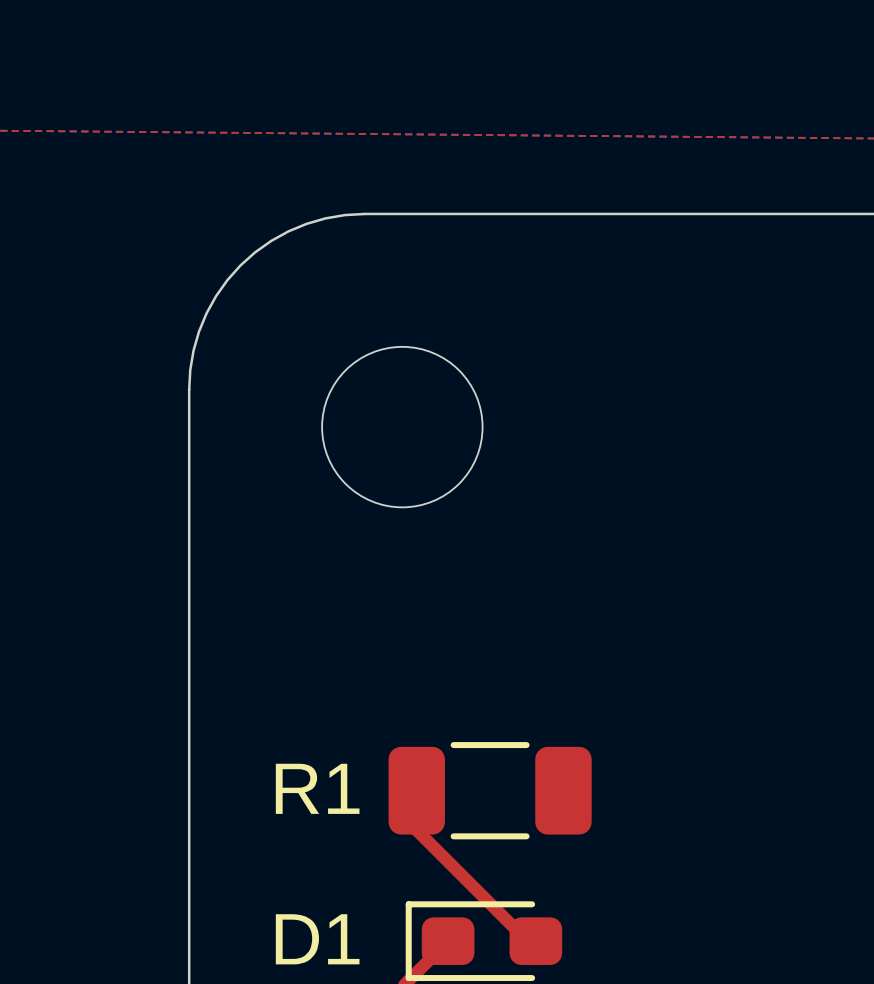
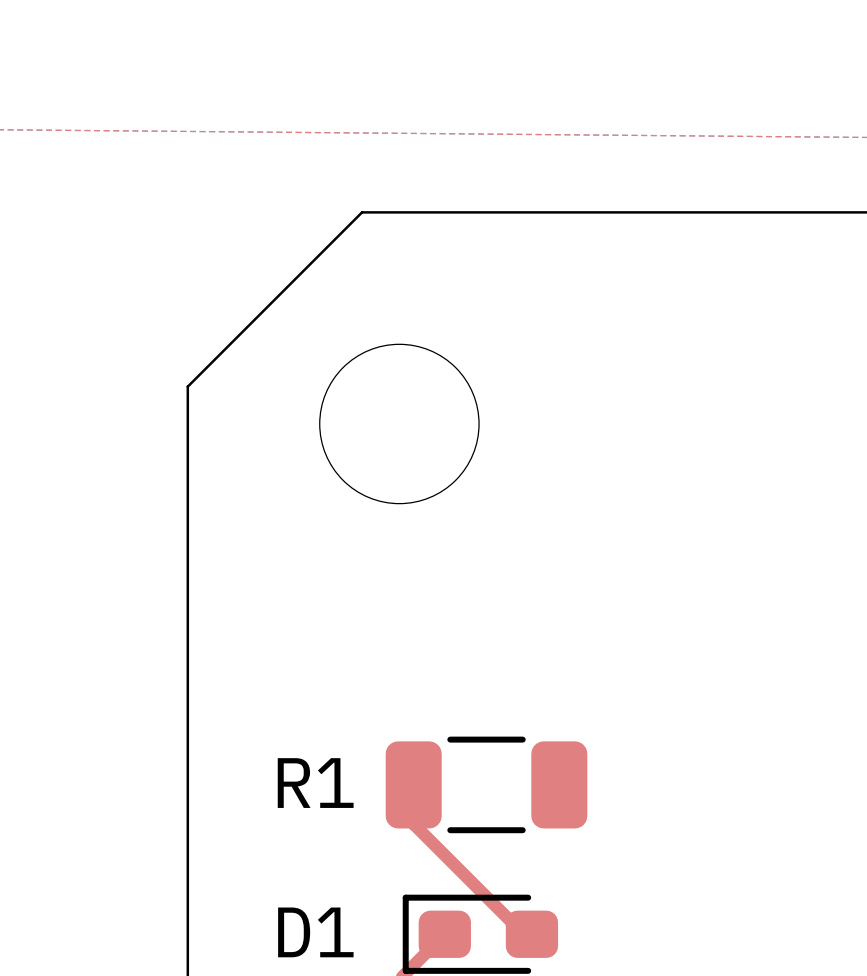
board edge: (364, 213) (345, 215) (306, 223) (271, 240) (240, 265) (227, 280) (206, 313) (193, 350) (189, 389) -> (362, 212) (187, 386)

